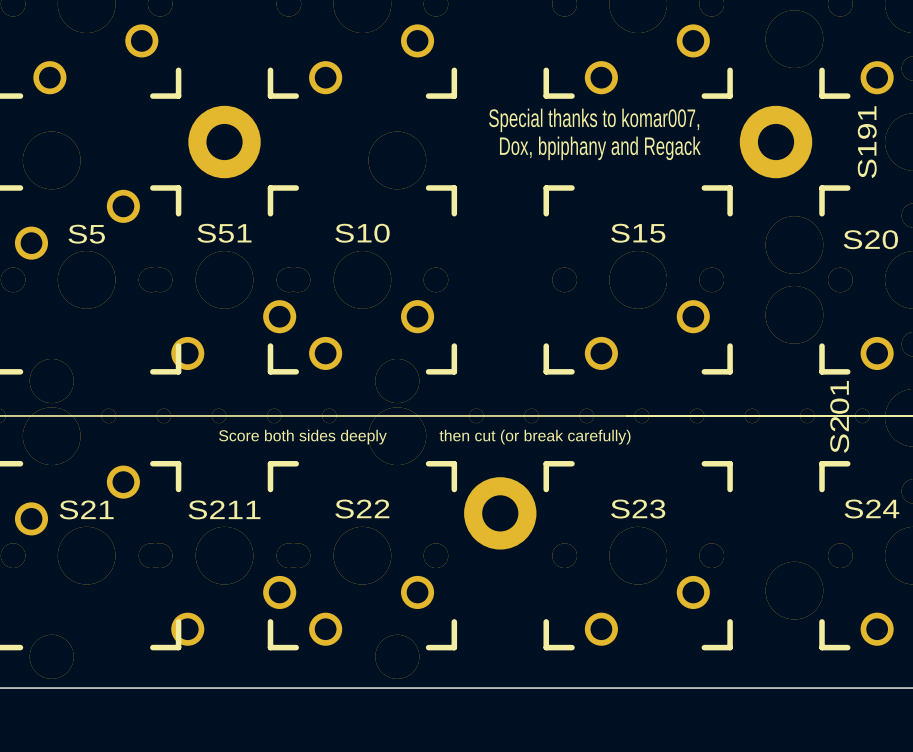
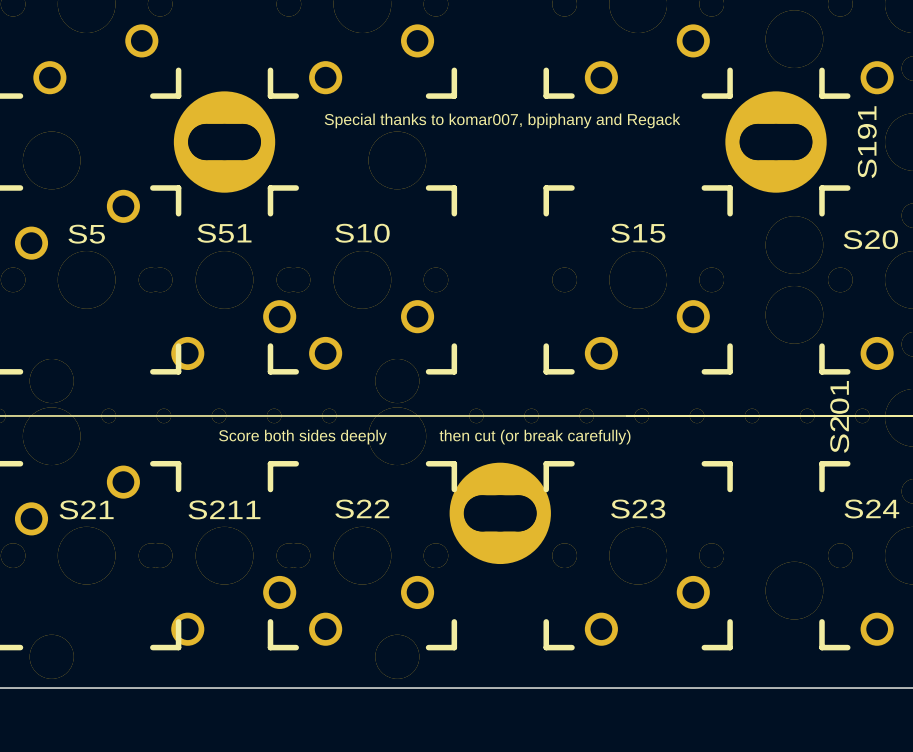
part footprint: [188, 105, 261, 179] -> [173, 91, 276, 193]
part footprint: [739, 105, 813, 179] -> [725, 91, 827, 193]
text: none -> Special thanks to komar007, bpiphany and Regack (502, 120)
text: Special thanks to komar007, (594, 120) -> none
text: Dox, bpiphany and Regack (600, 148) -> none
part footprint: [464, 477, 537, 550] -> [449, 462, 551, 565]

